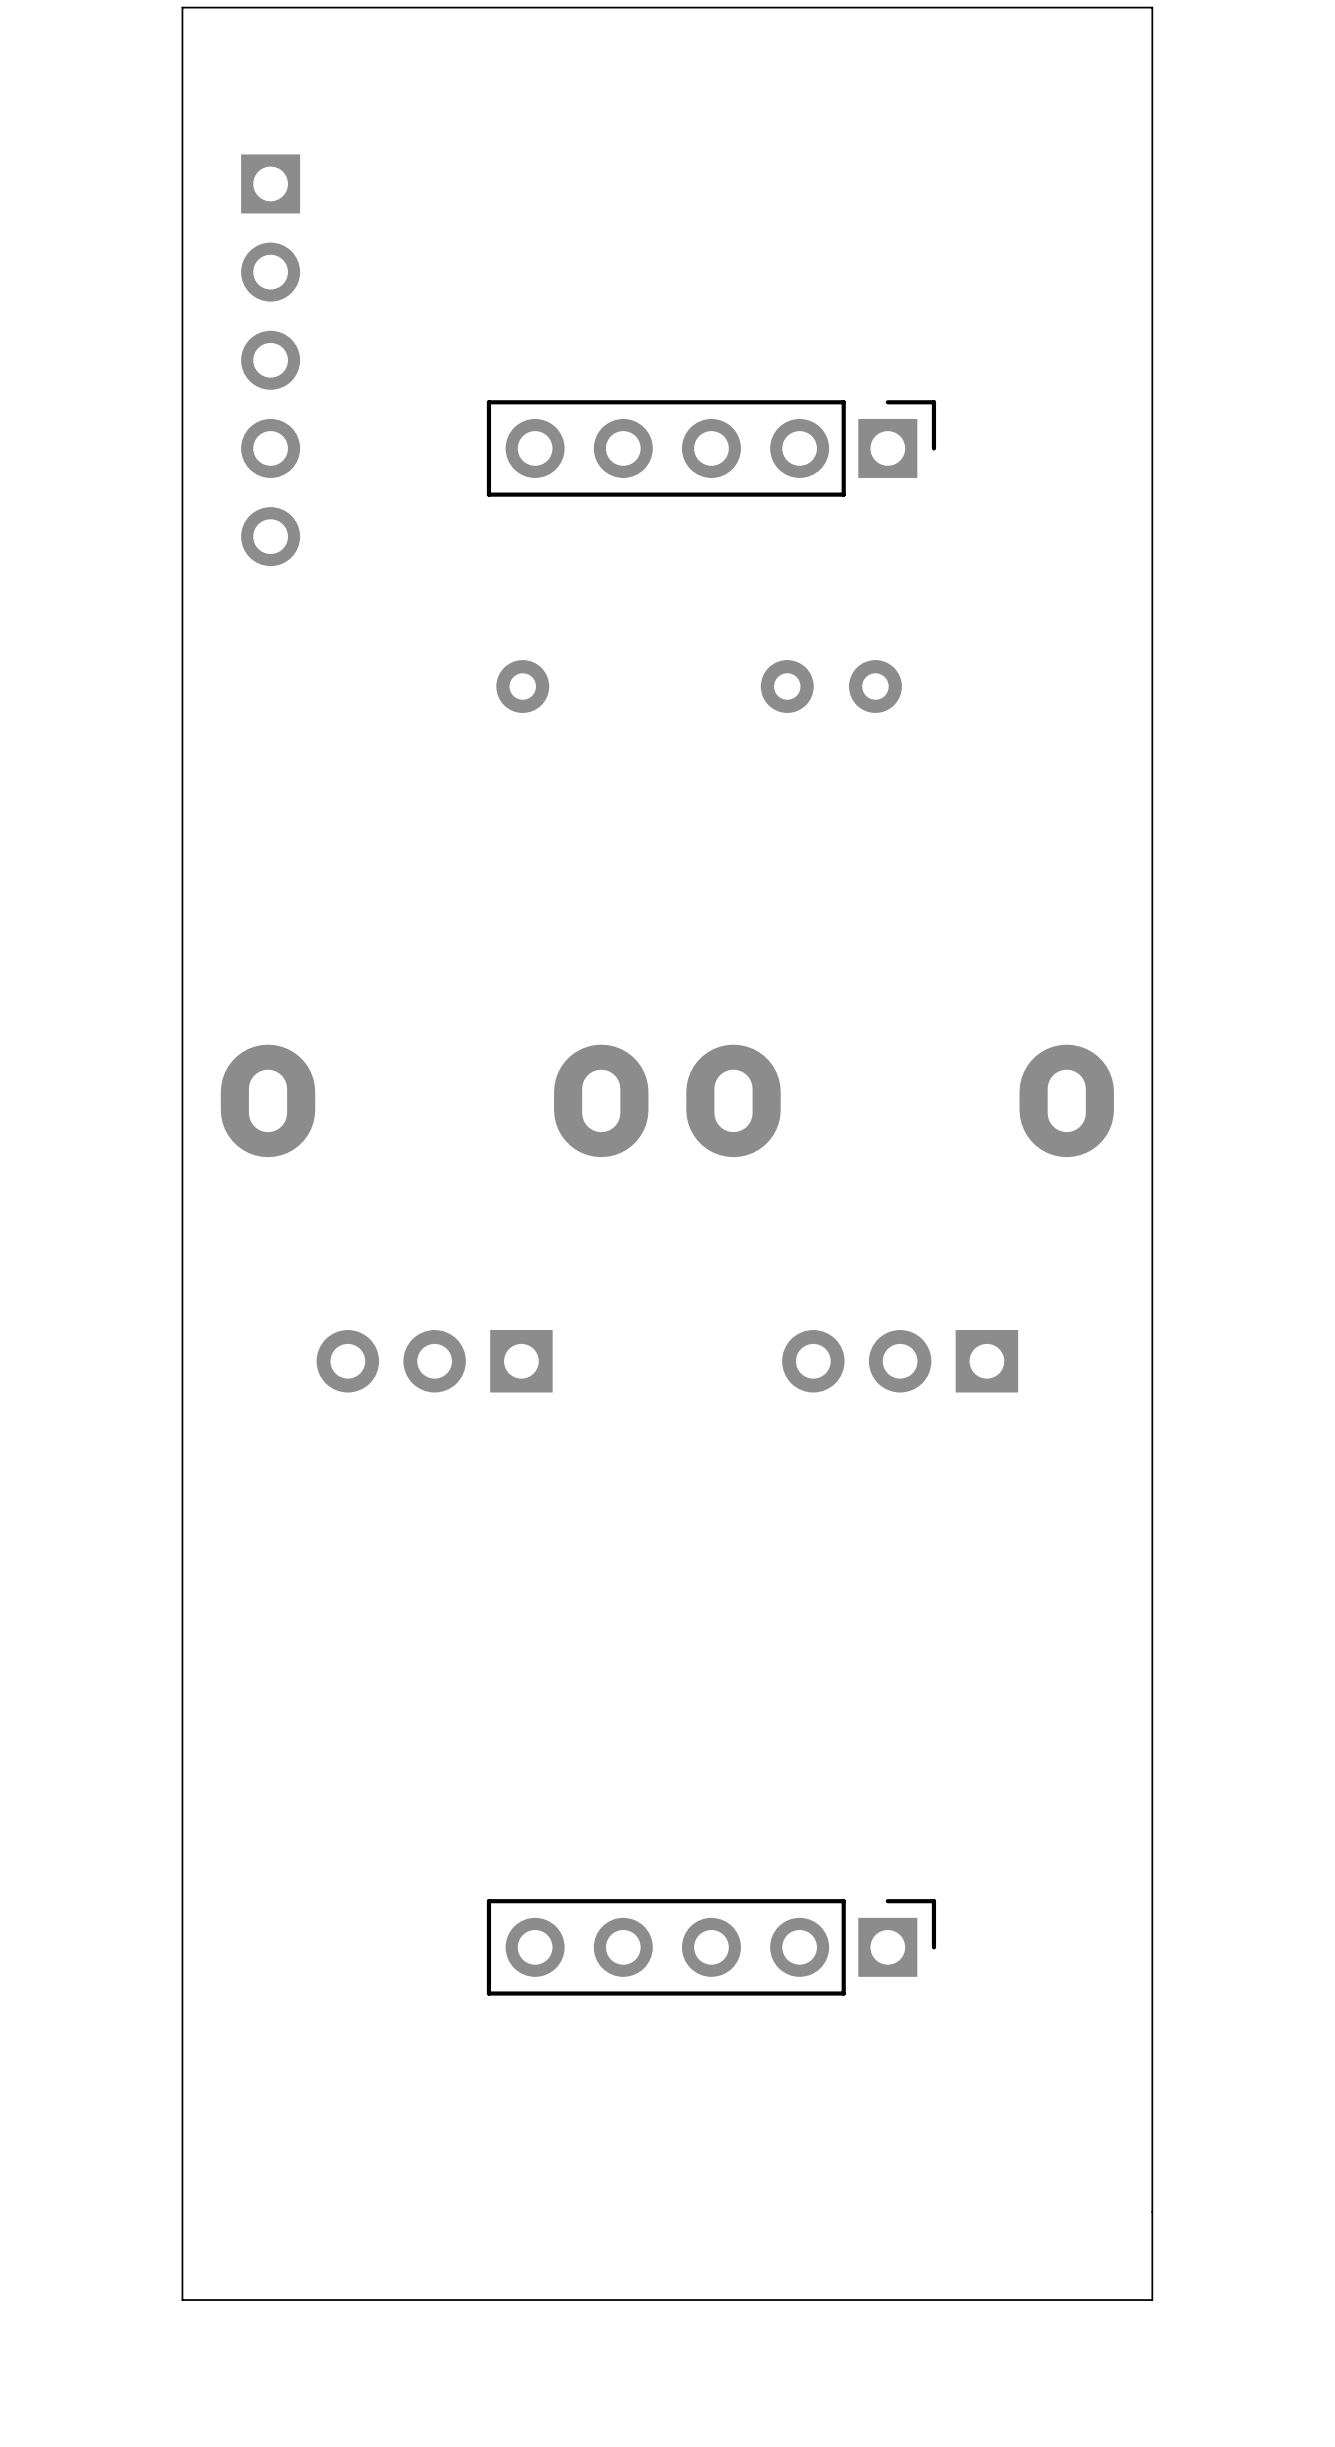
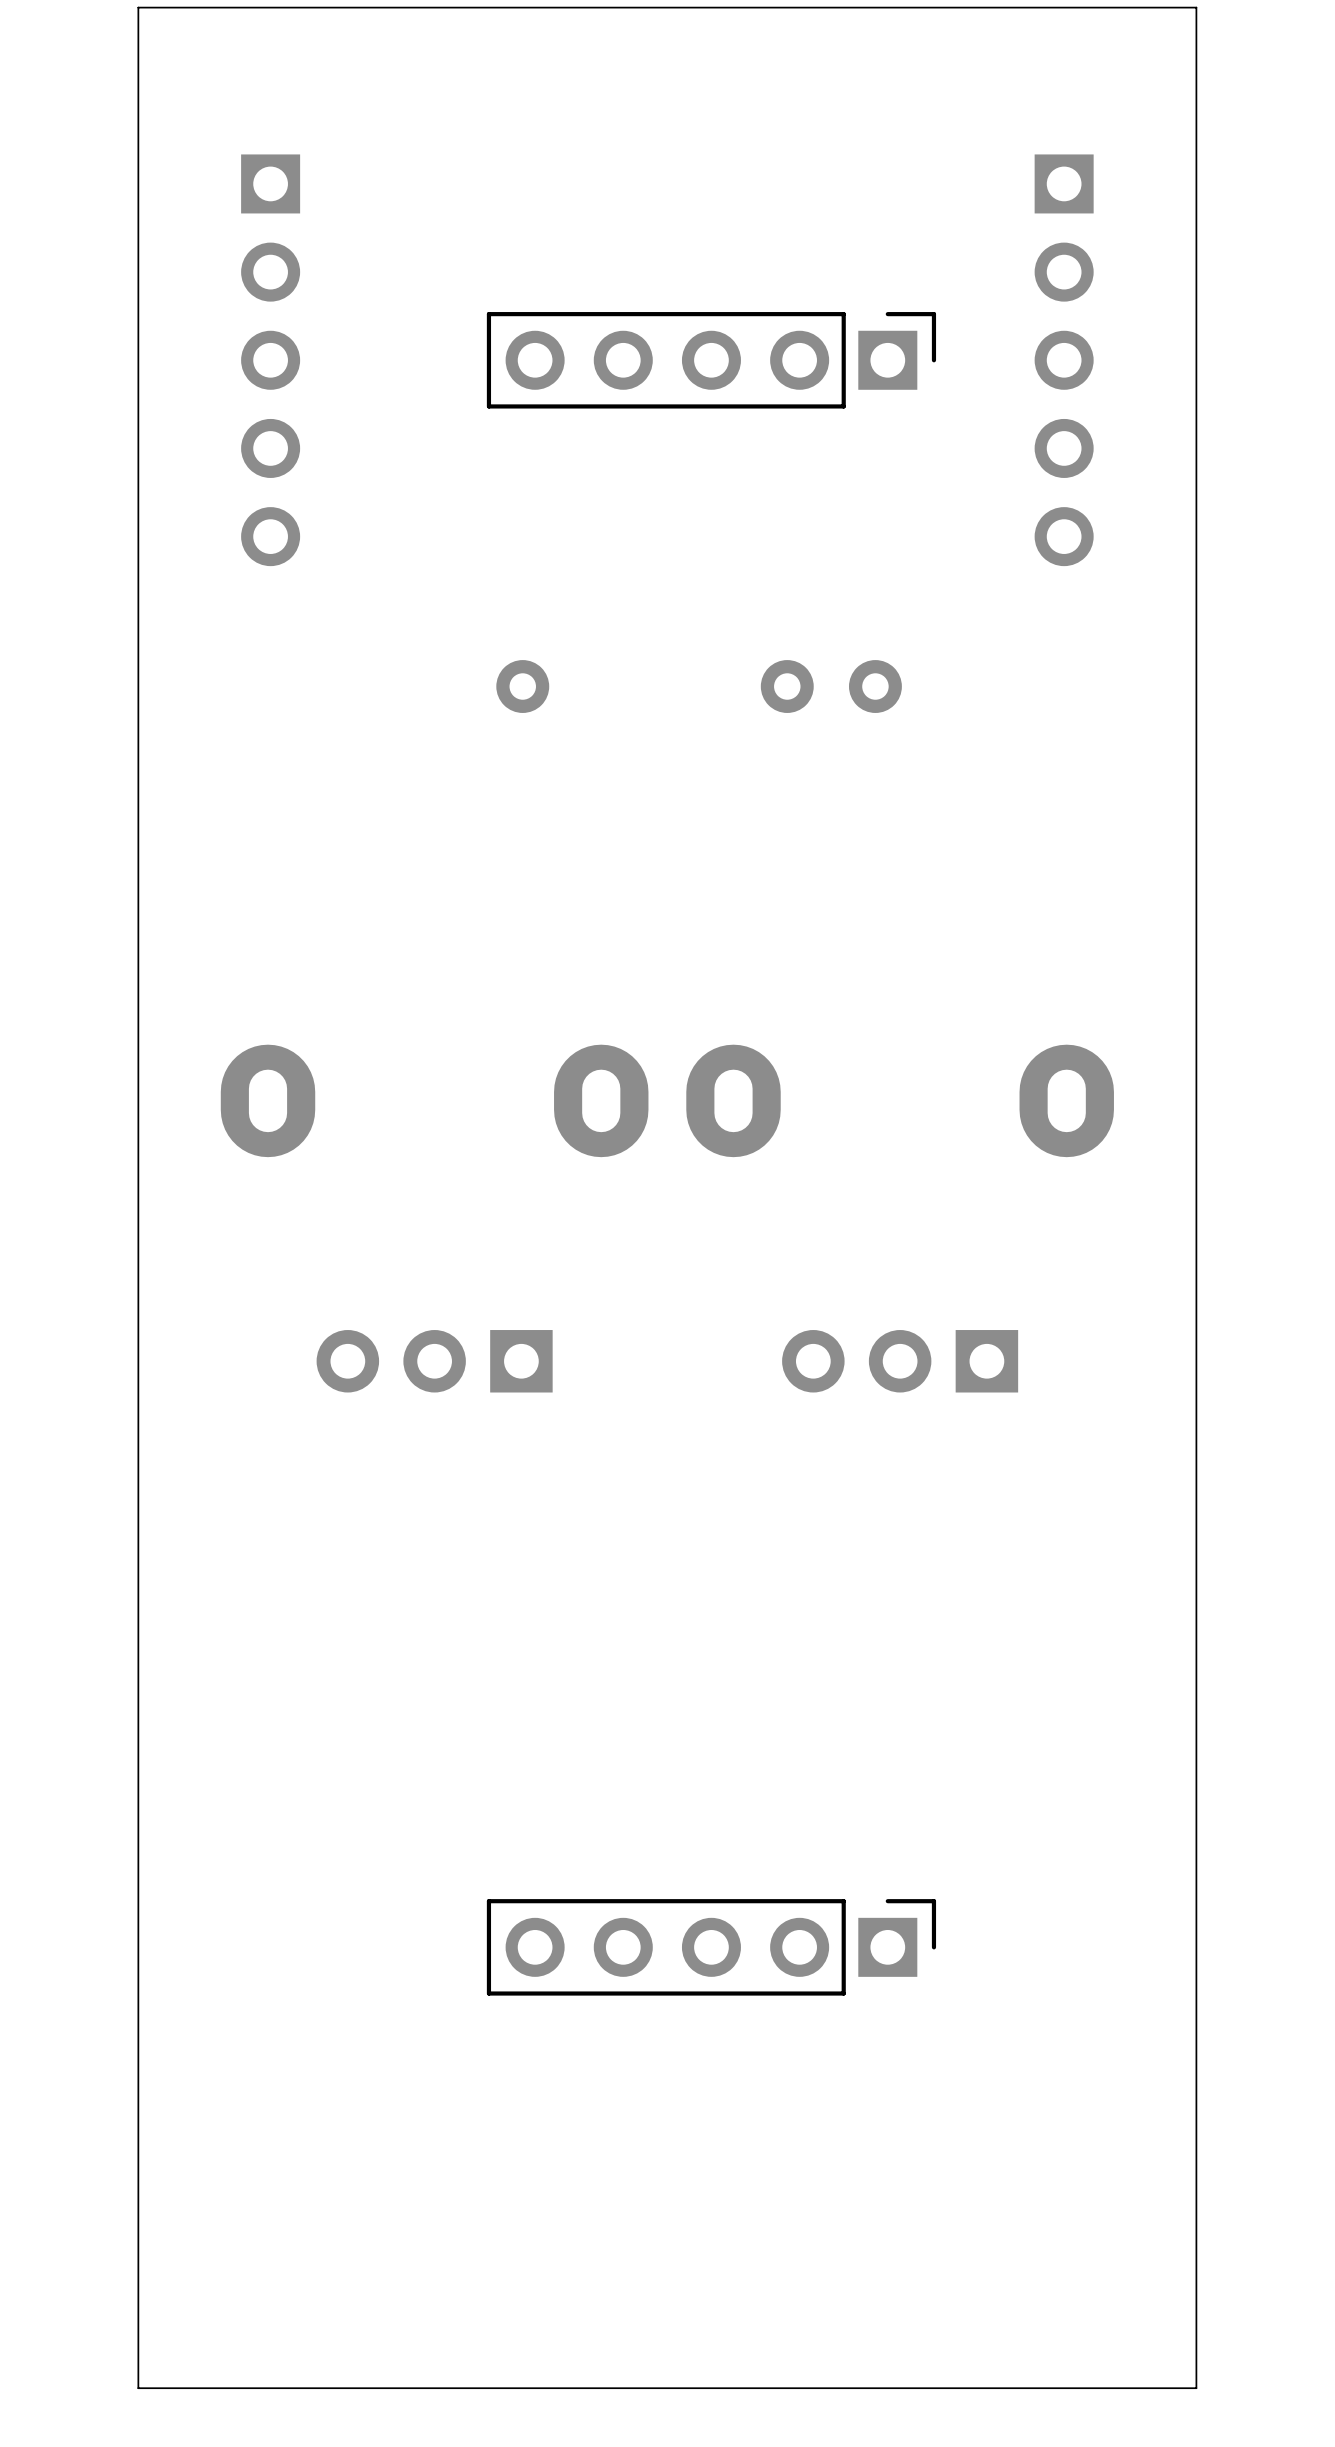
board edge: (1152, 7) (1152, 2300) (182, 2300) (182, 7) -> (1152, 7) (1196, 7) (1196, 2388) (138, 2388) (138, 7) (182, 7)
part: none -> (1064, 360)
part position: (711, 448) -> (711, 360)

